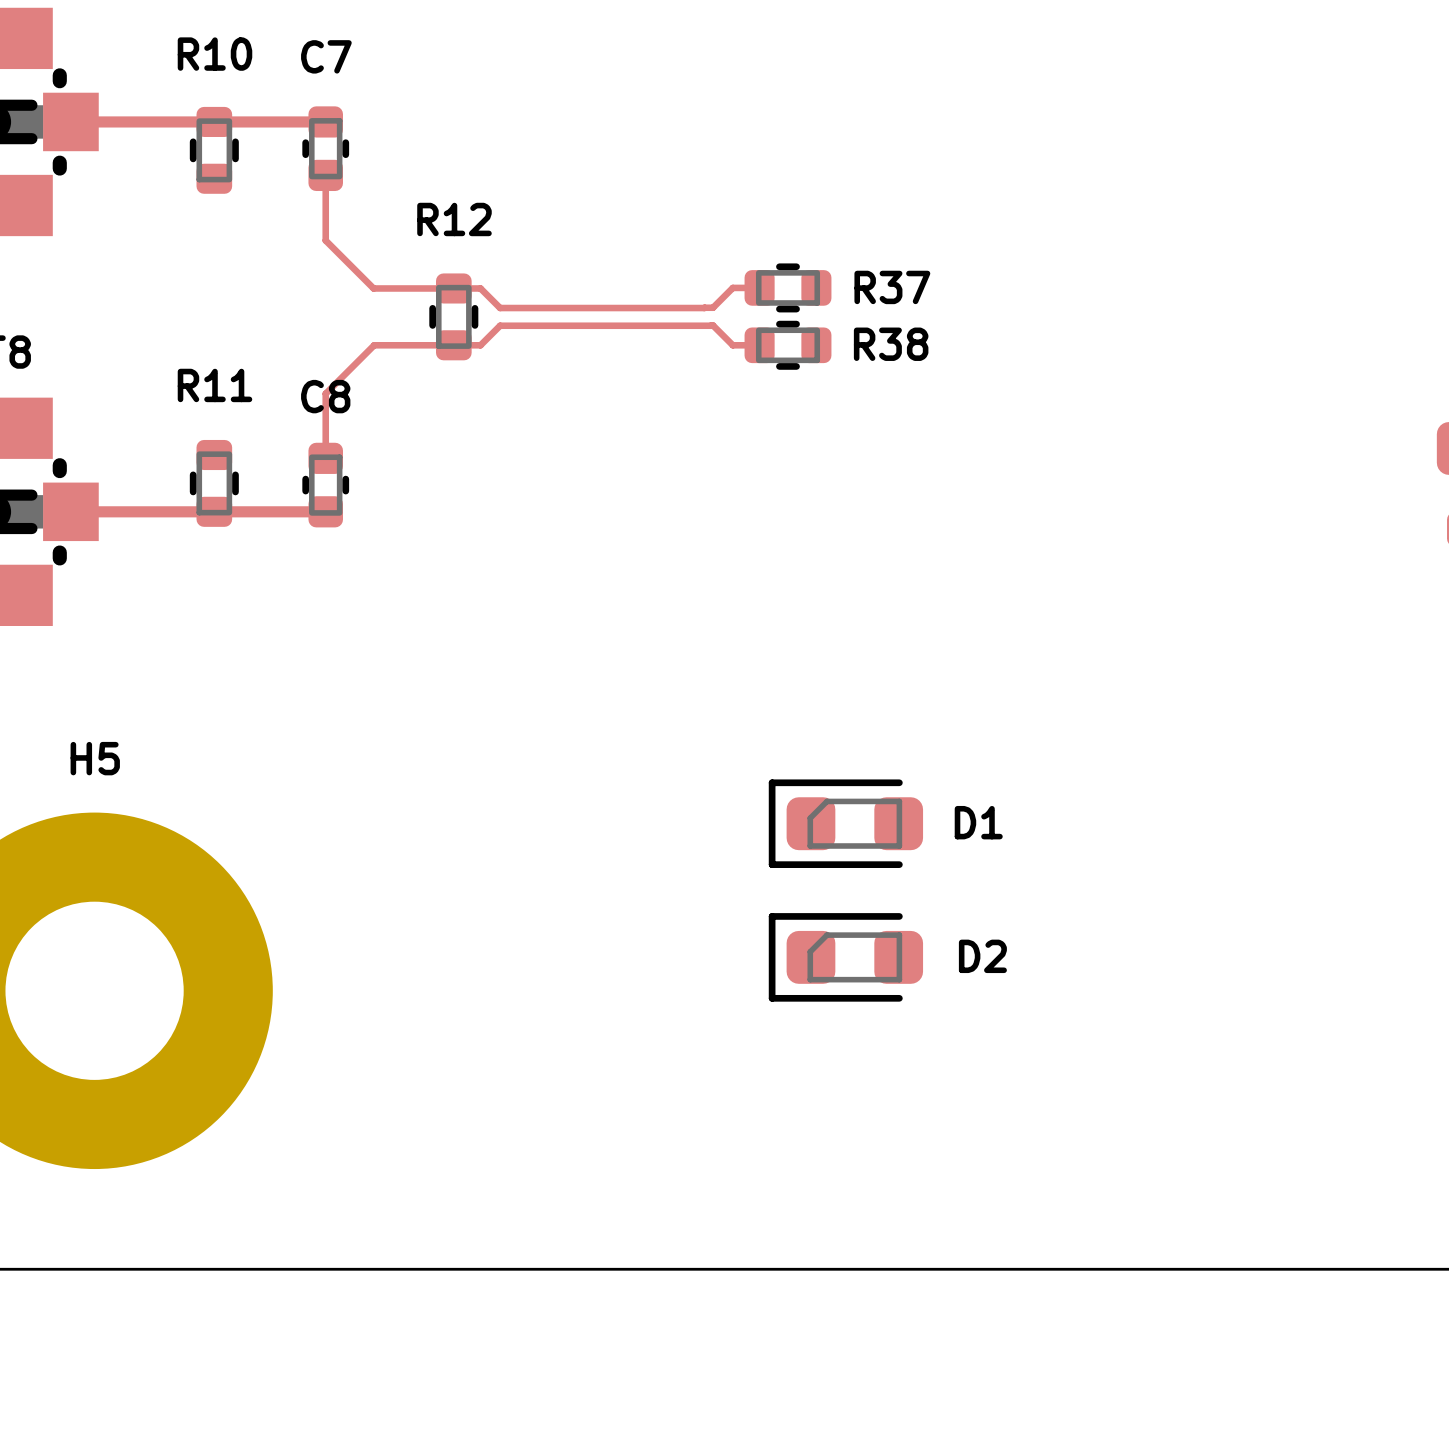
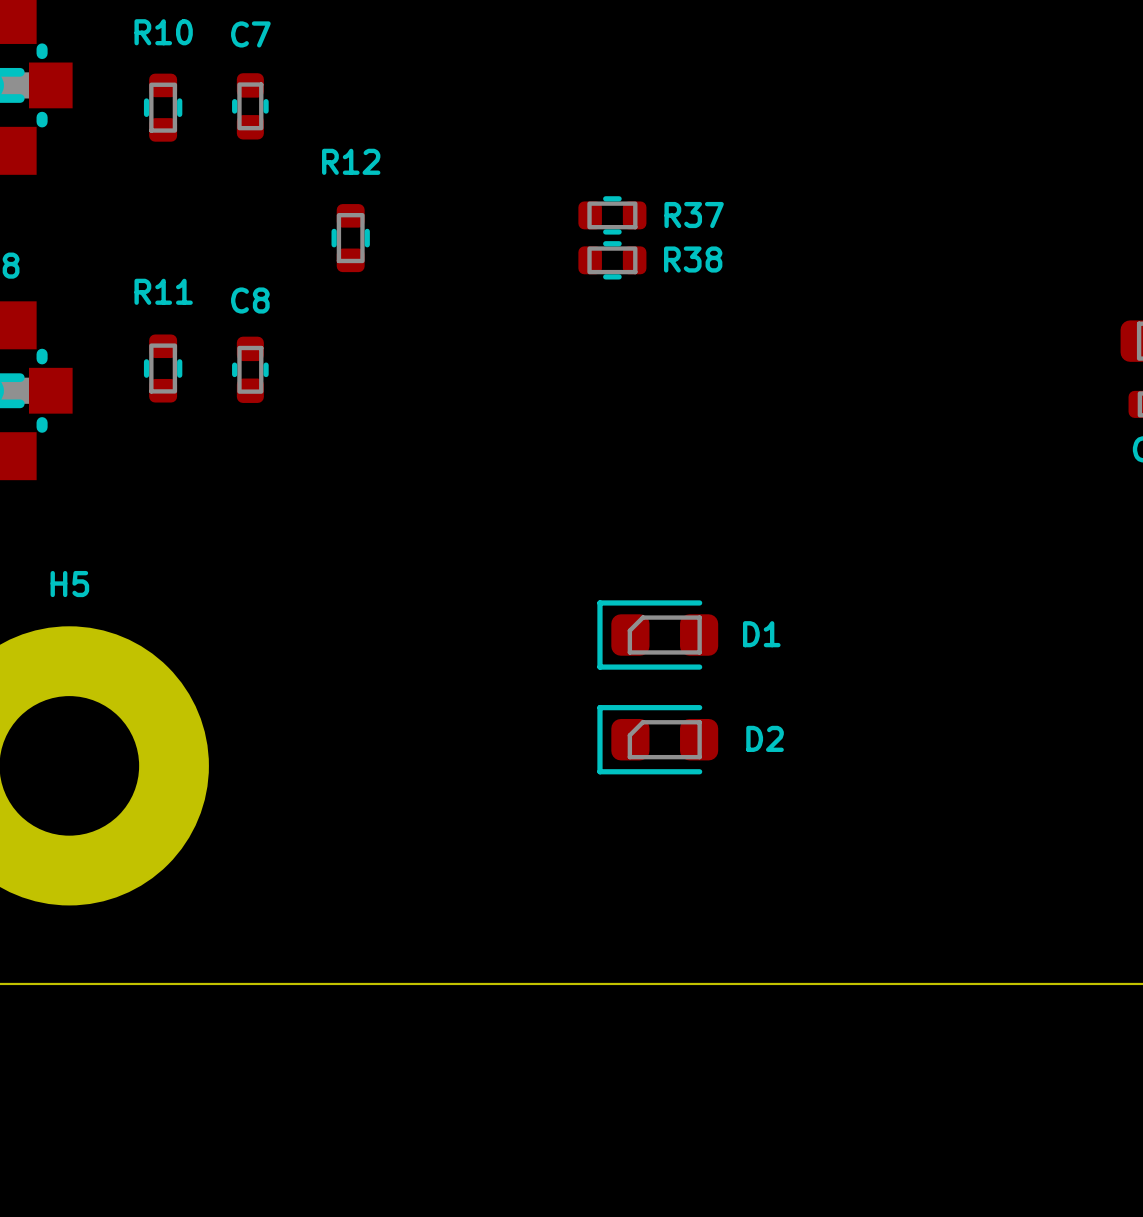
top track: (70, 121) (325, 121) -> none
top track: (325, 175) (325, 240) (373, 288) (480, 288) (500, 308) (713, 307) (732, 287) (759, 287) -> none
top track: (711, 325) (732, 345) (759, 345) -> none
top track: (711, 325) (500, 325) (480, 345) (374, 345) (325, 393) (325, 458) -> none
top track: (70, 511) (325, 511) -> none

